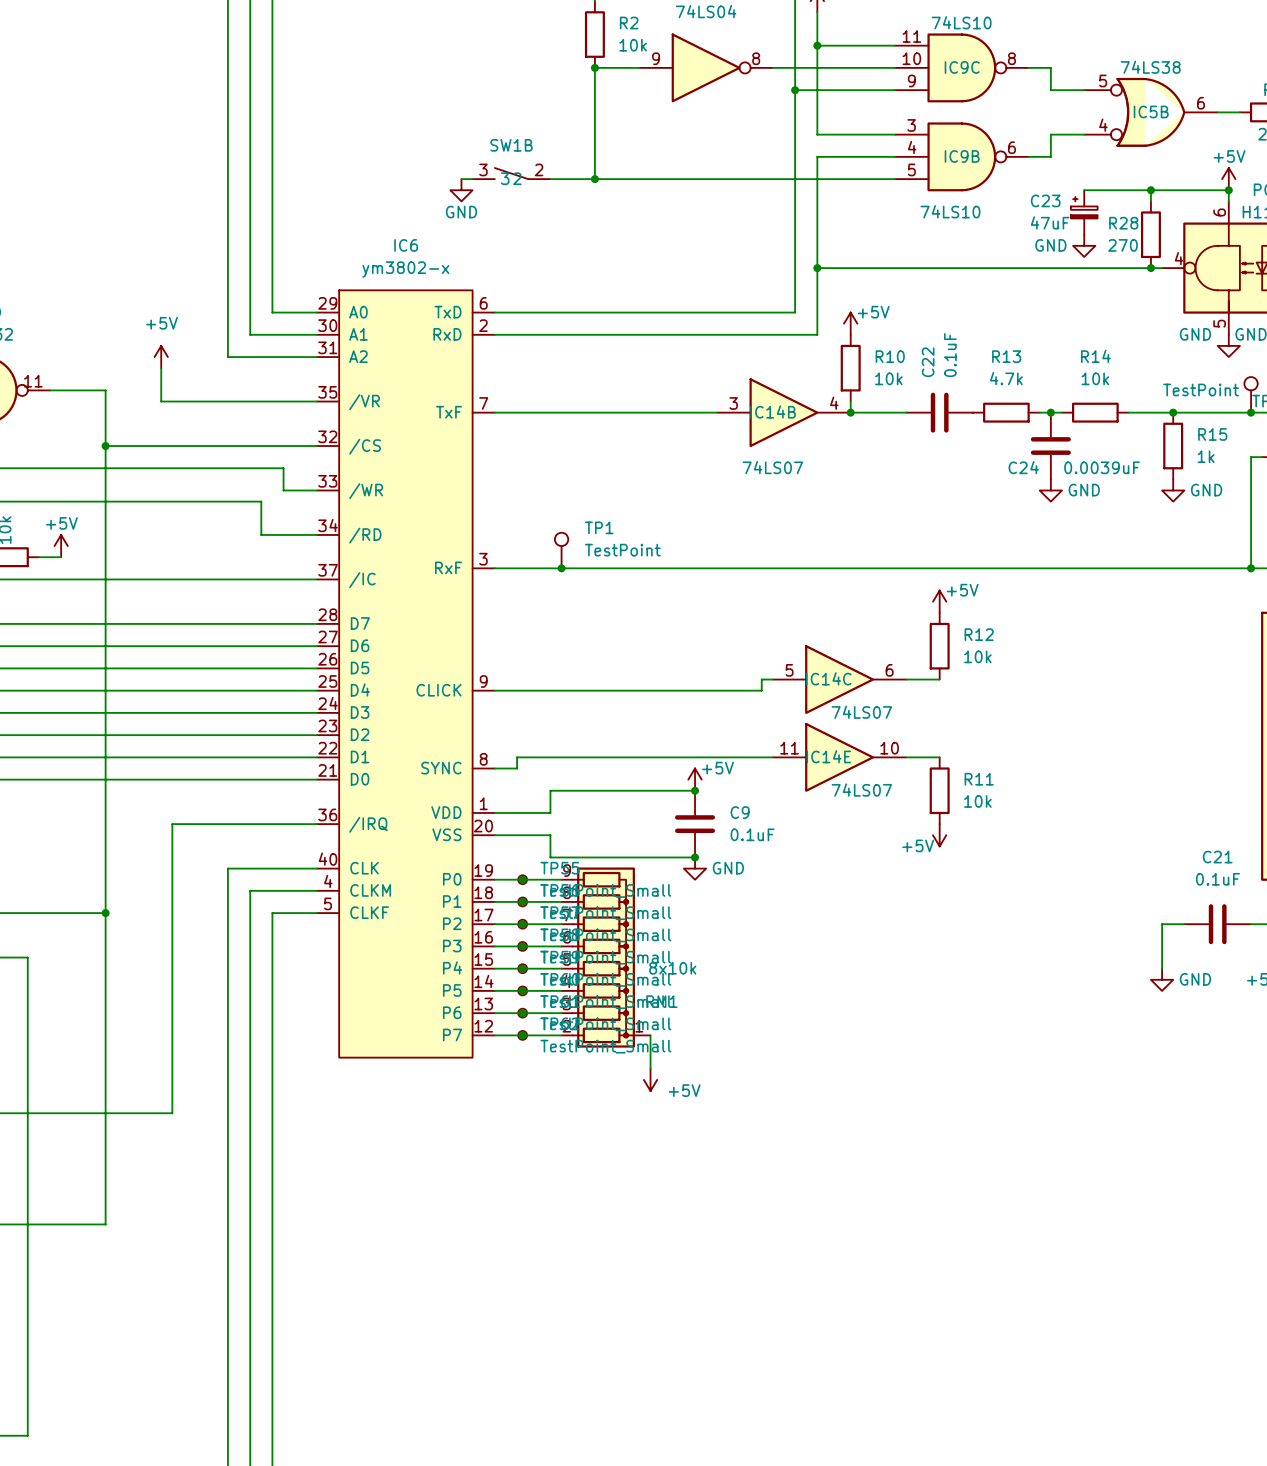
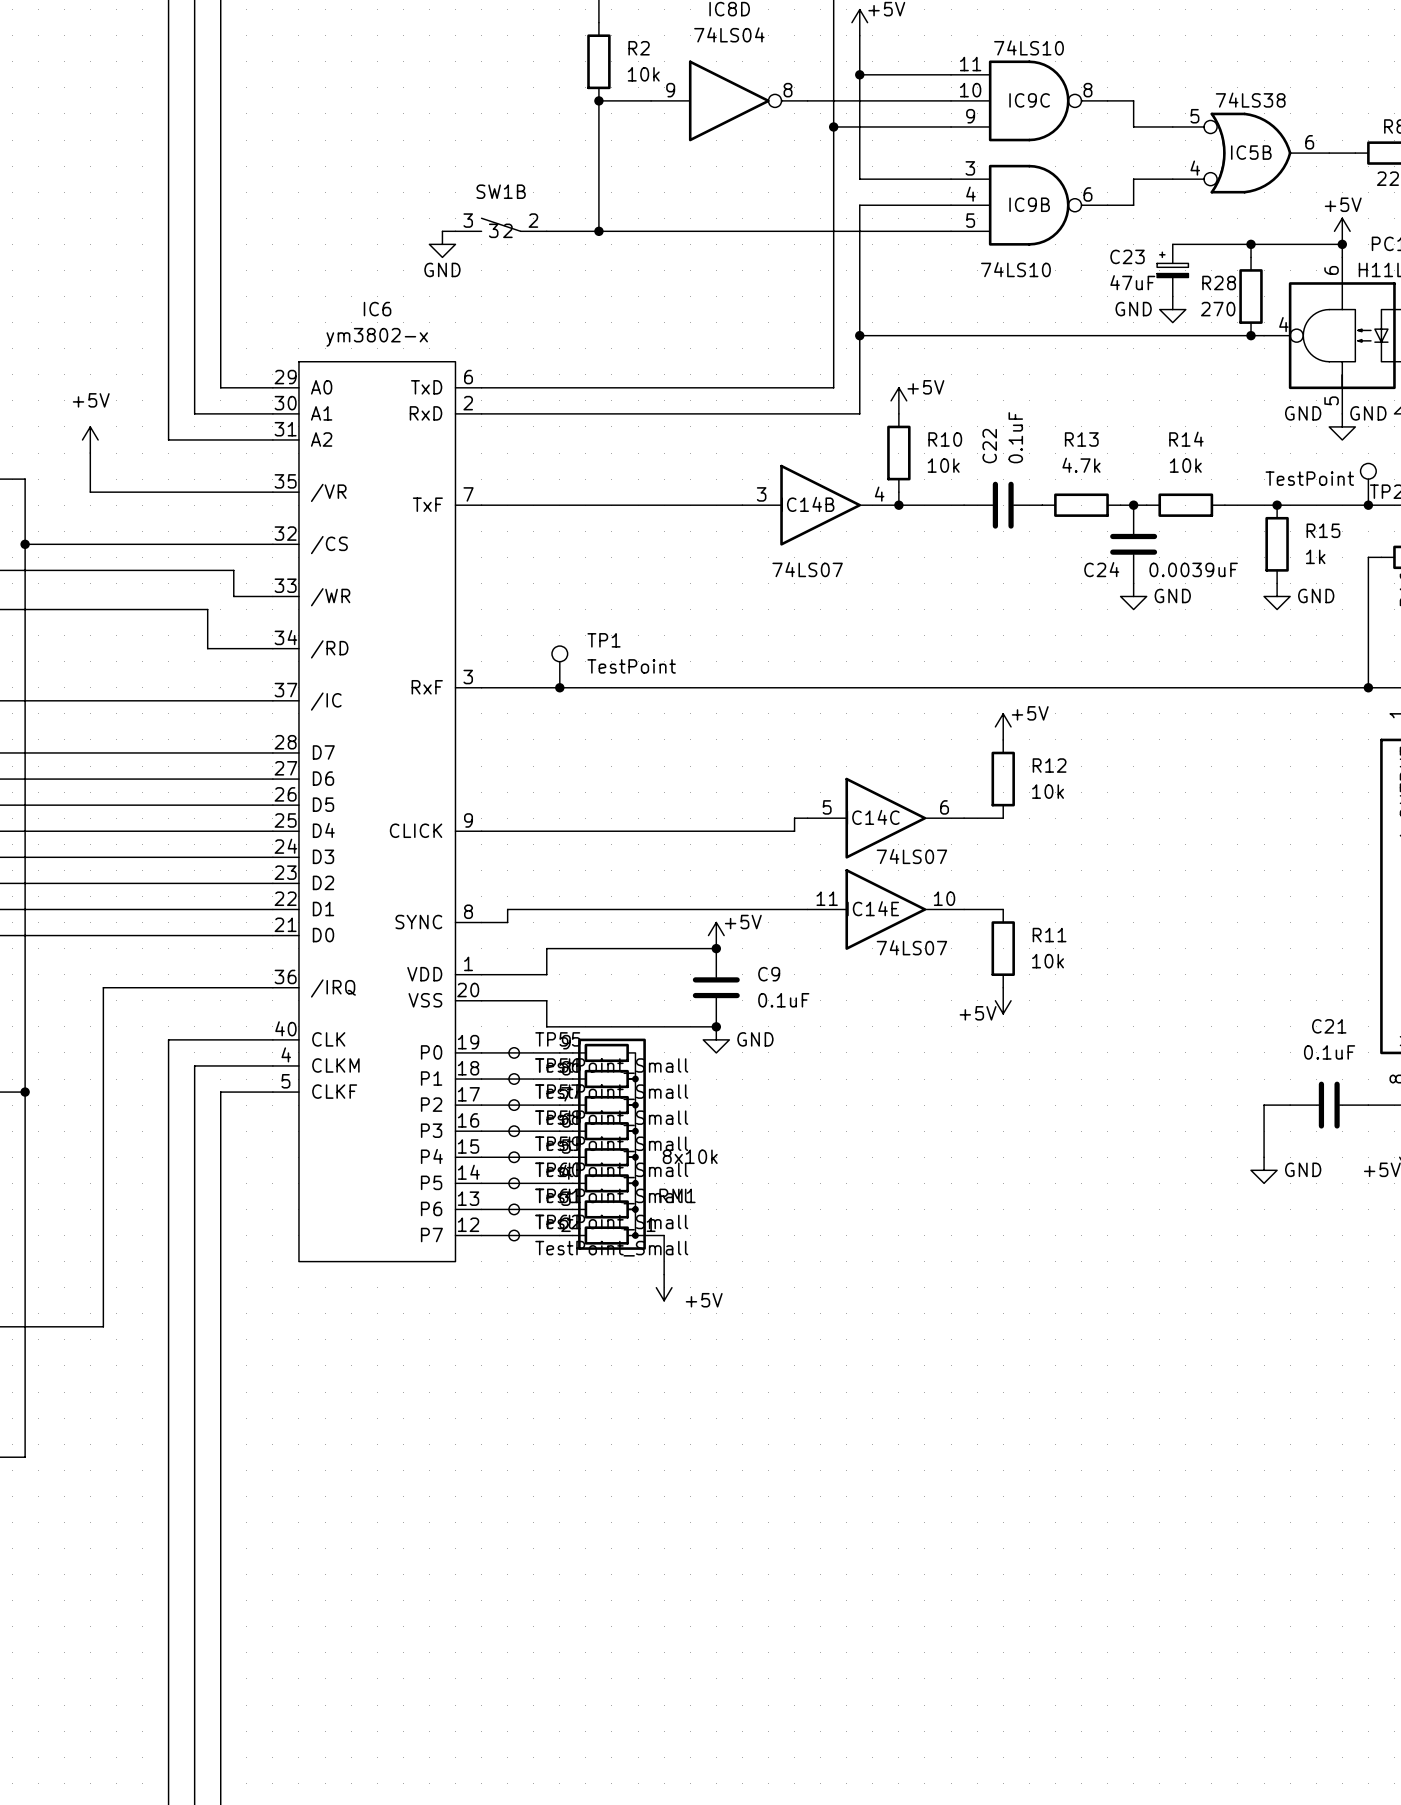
junction: (522, 879) -> none
junction: (522, 901) -> none
junction: (522, 924) -> none
junction: (522, 946) -> none
junction: (522, 968) -> none
junction: (522, 990) -> none
junction: (522, 1013) -> none
junction: (522, 1035) -> none

